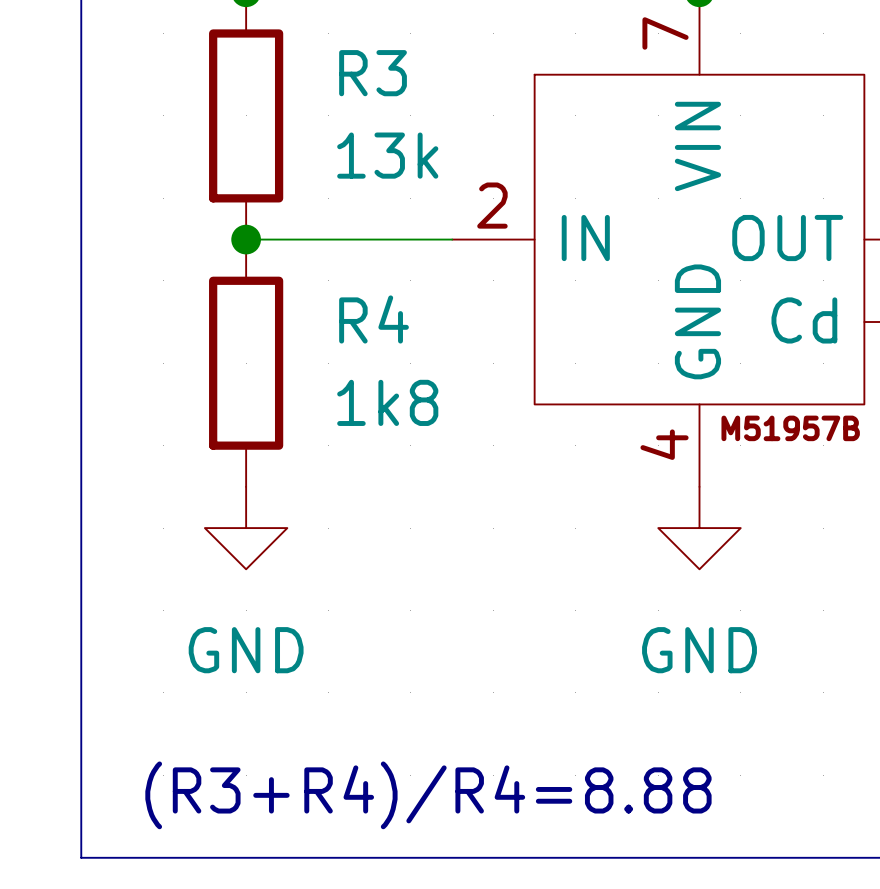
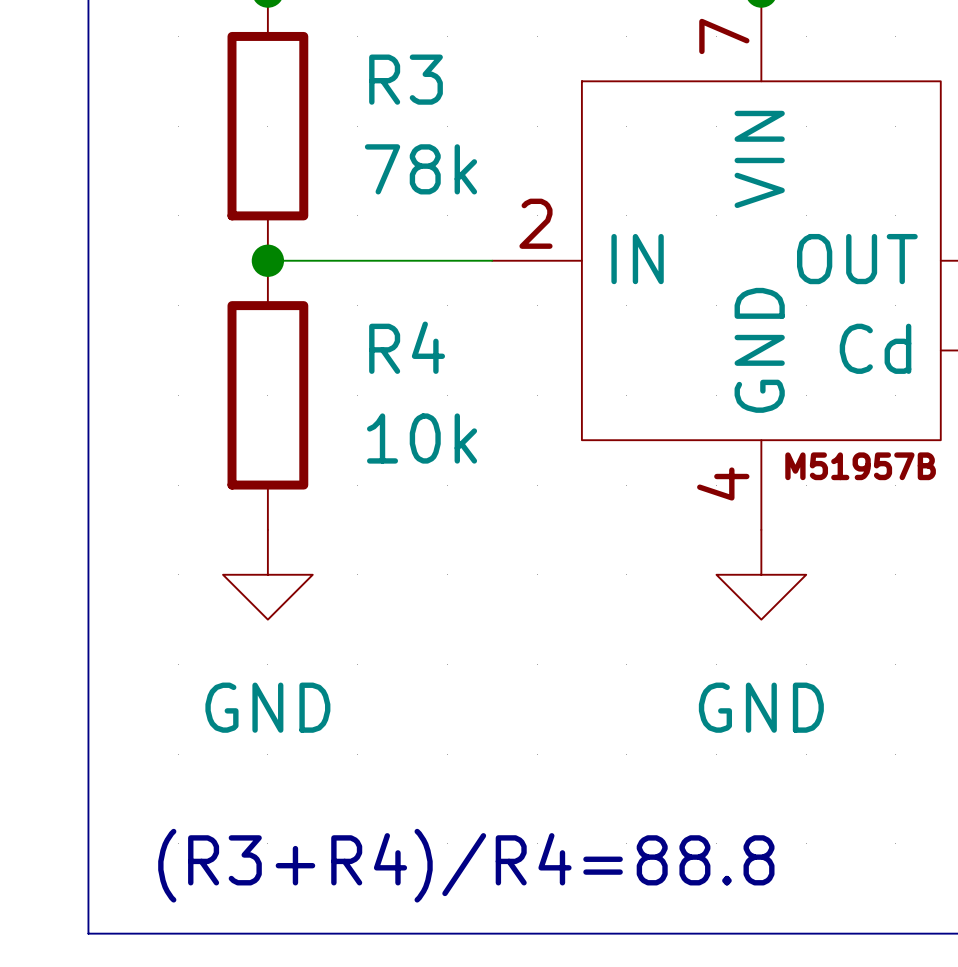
R3 value: 13k (387, 155) -> 78k (420, 169)
R4 value: 1k8 (387, 402) -> 10k (422, 438)
text: (R3+R4)/R4=8.88 (428, 795) -> (R3+R4)/R4=88.8 (466, 865)

